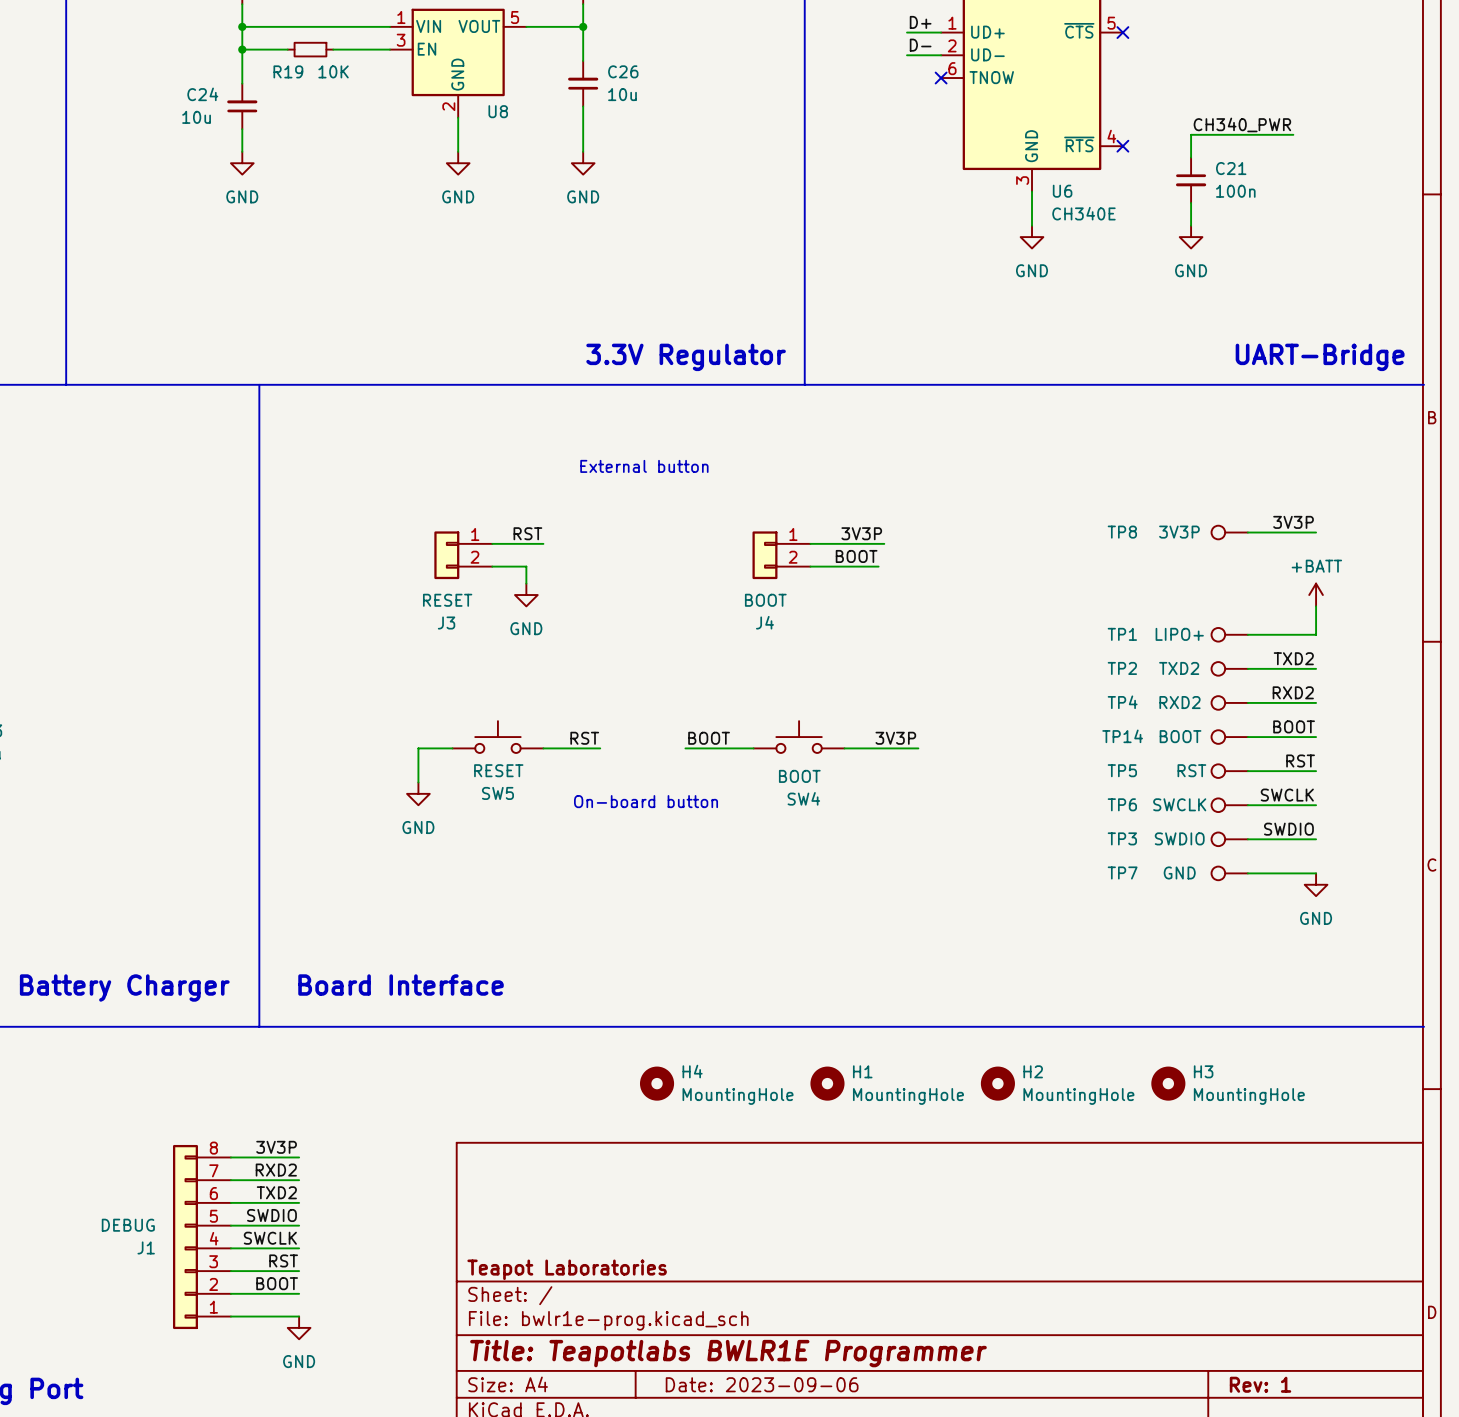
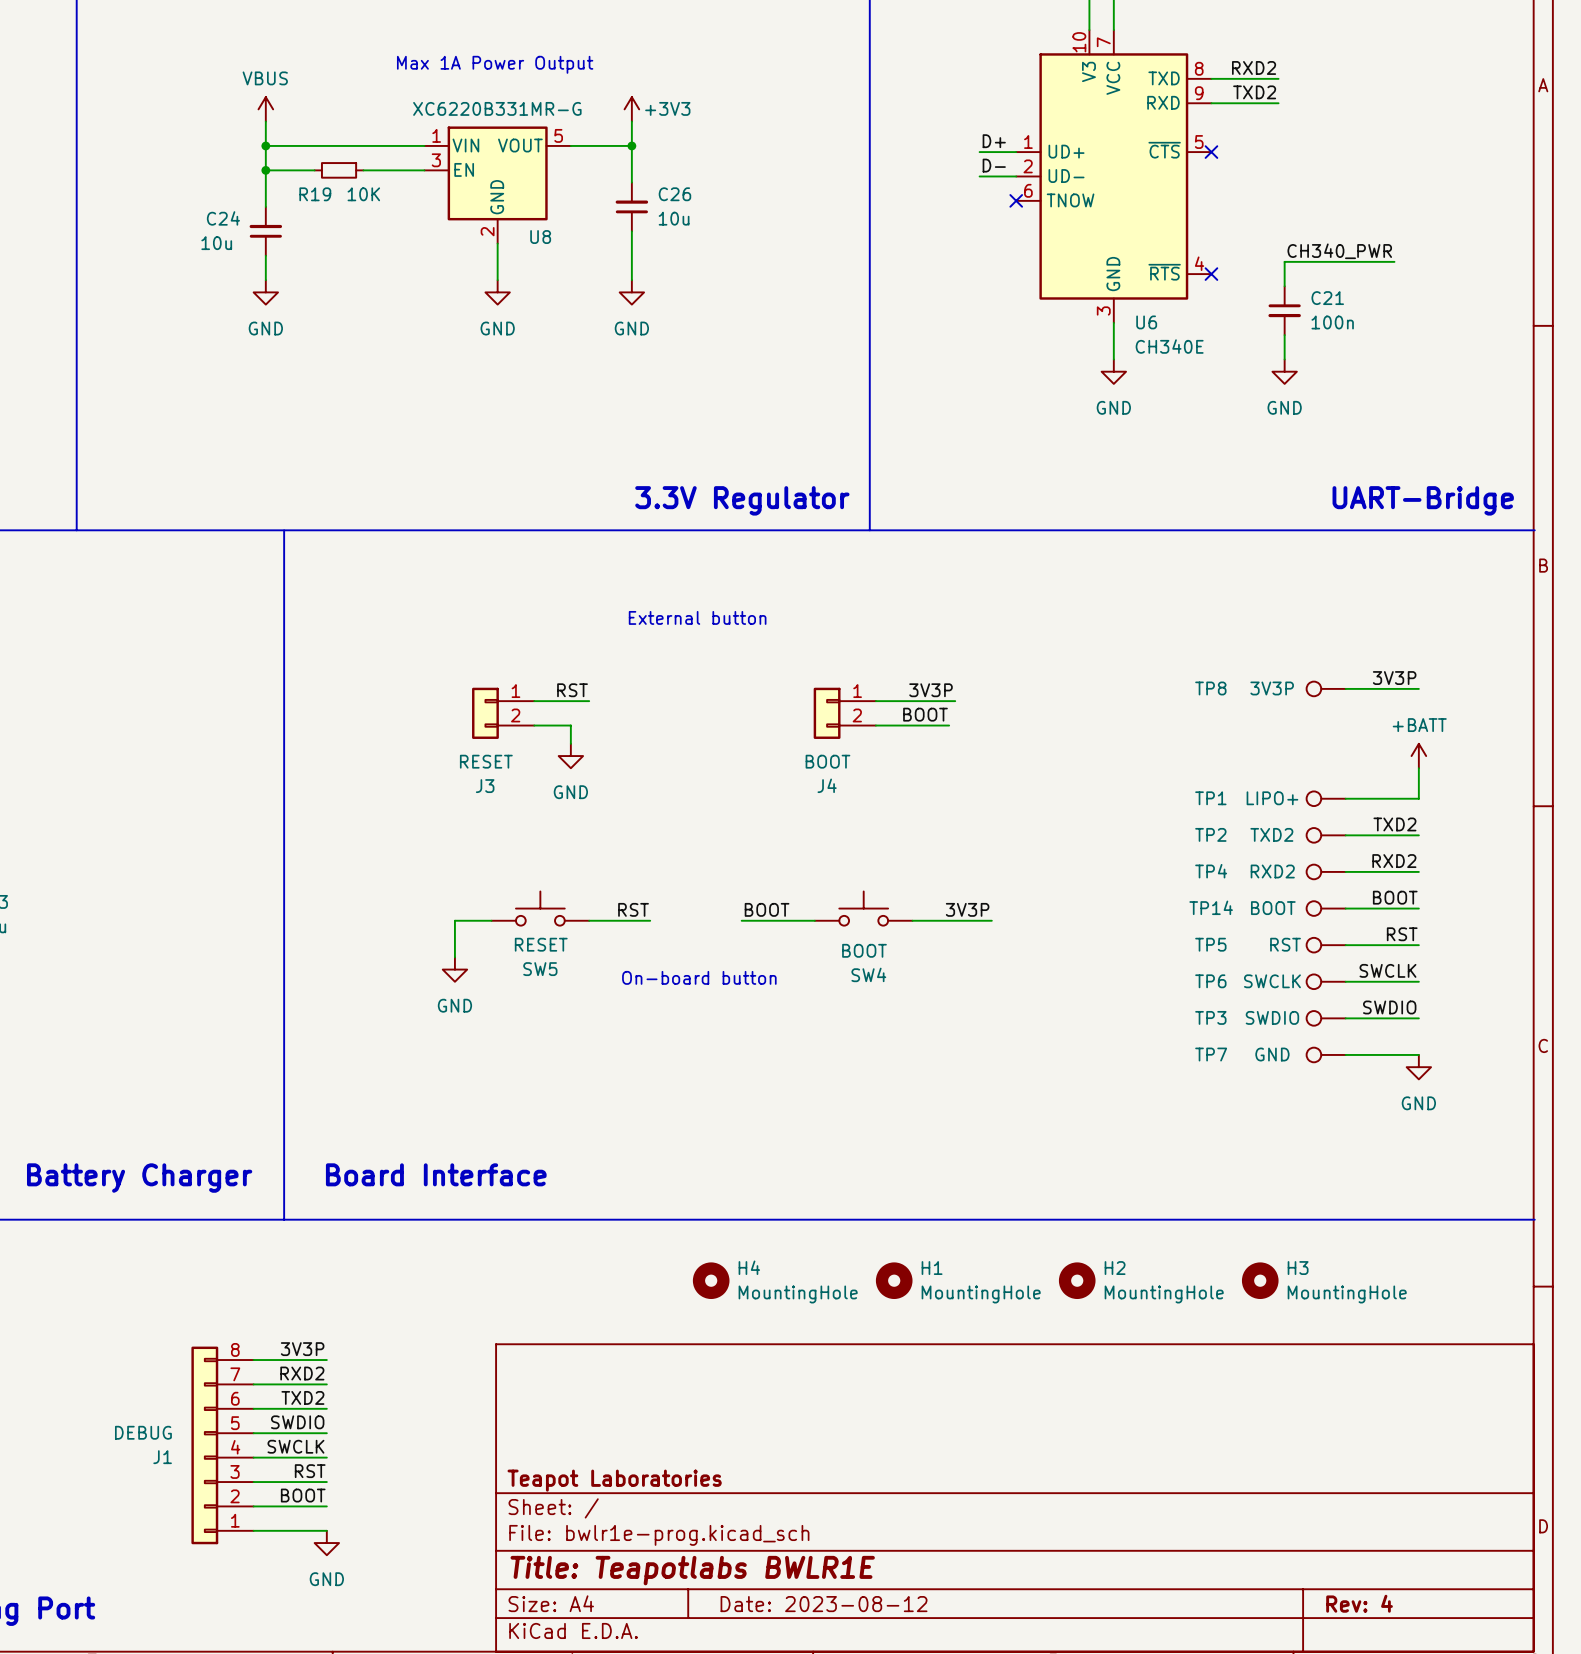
title block: Title: Teapotlabs BWLR1E Programmer (728, 1353) -> Title: Teapotlabs BWLR1E (692, 1570)
title block: Date: 2023-09-06 (762, 1384) -> Date: 2023-08-12 (824, 1604)
title block: Rev: 1 (1260, 1384) -> Rev: 4 (1359, 1603)

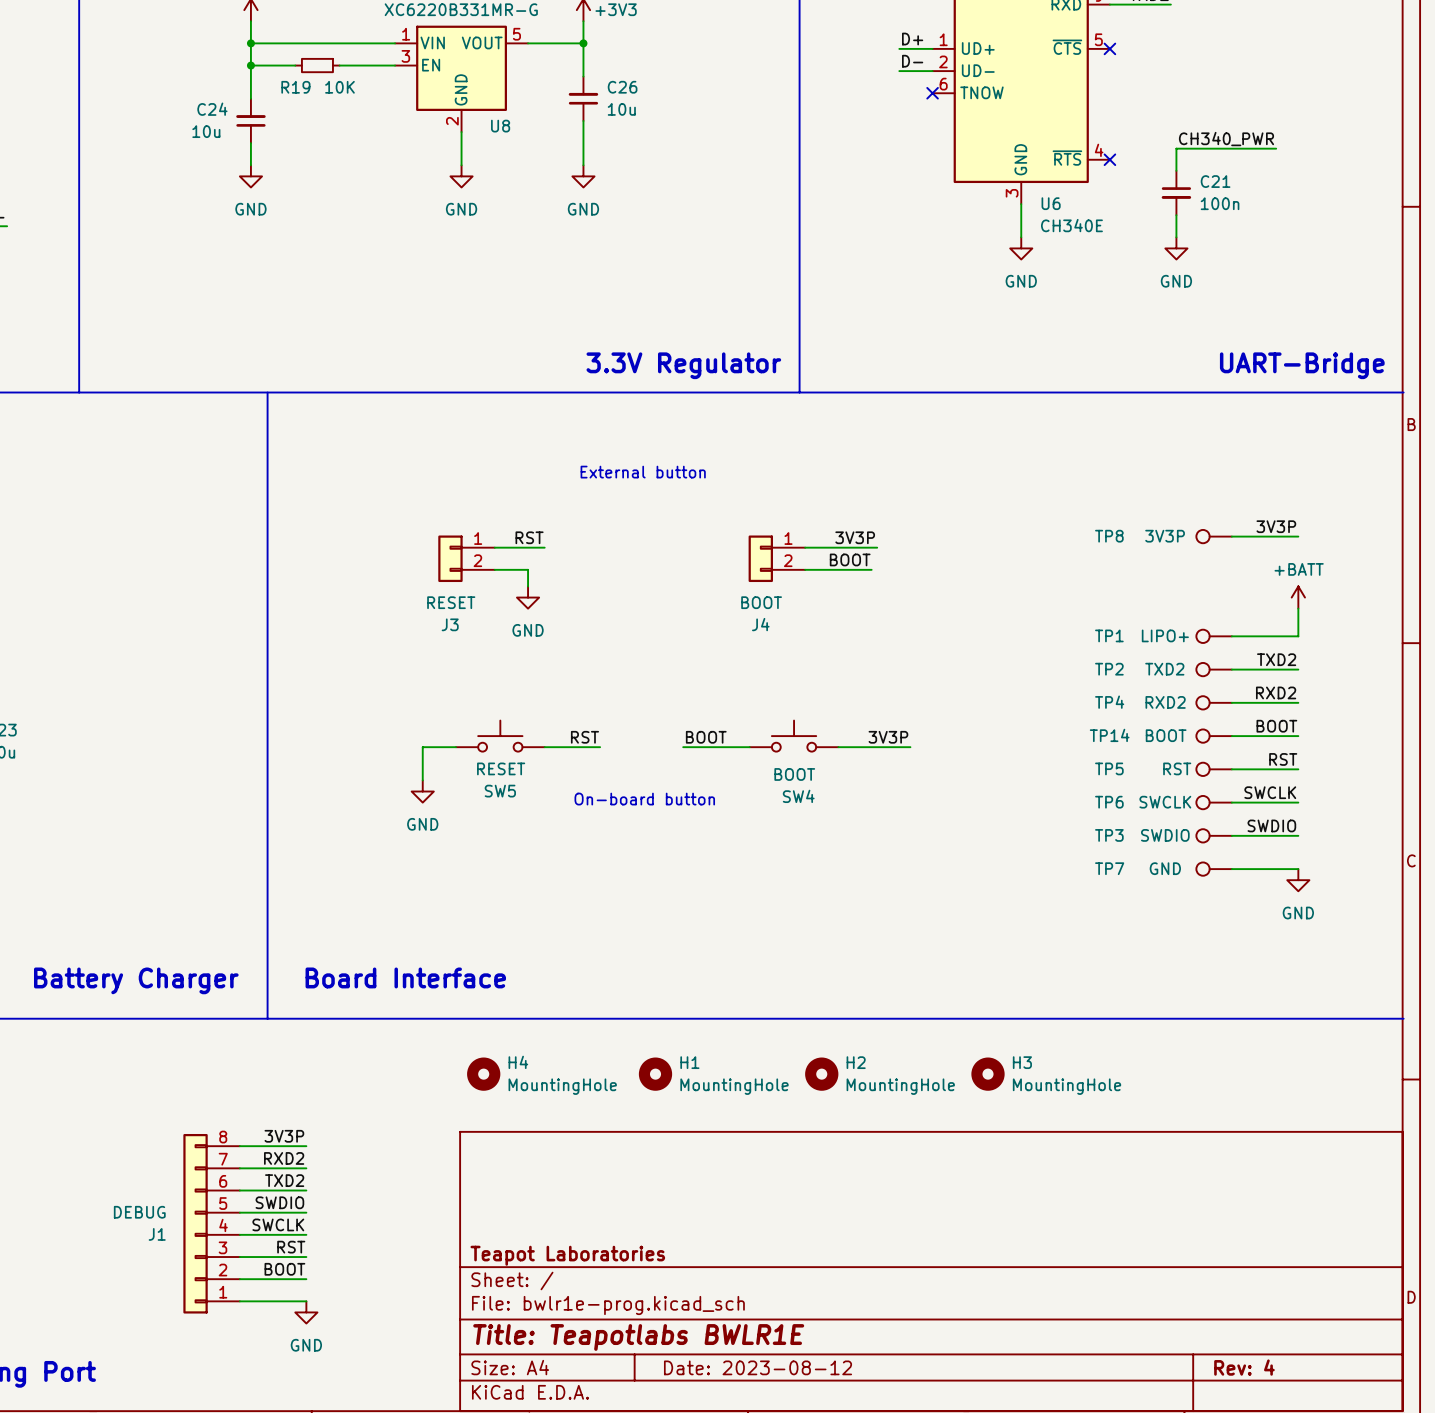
H4 name: H4 (749, 1267) -> H1 (689, 1062)
H1 name: H1 (932, 1268) -> H2 (856, 1062)
H2 name: H2 (1115, 1268) -> H3 (1022, 1062)
H4: none -> MountingHole (483, 1074)
H3: MountingHole (1260, 1280) -> none

